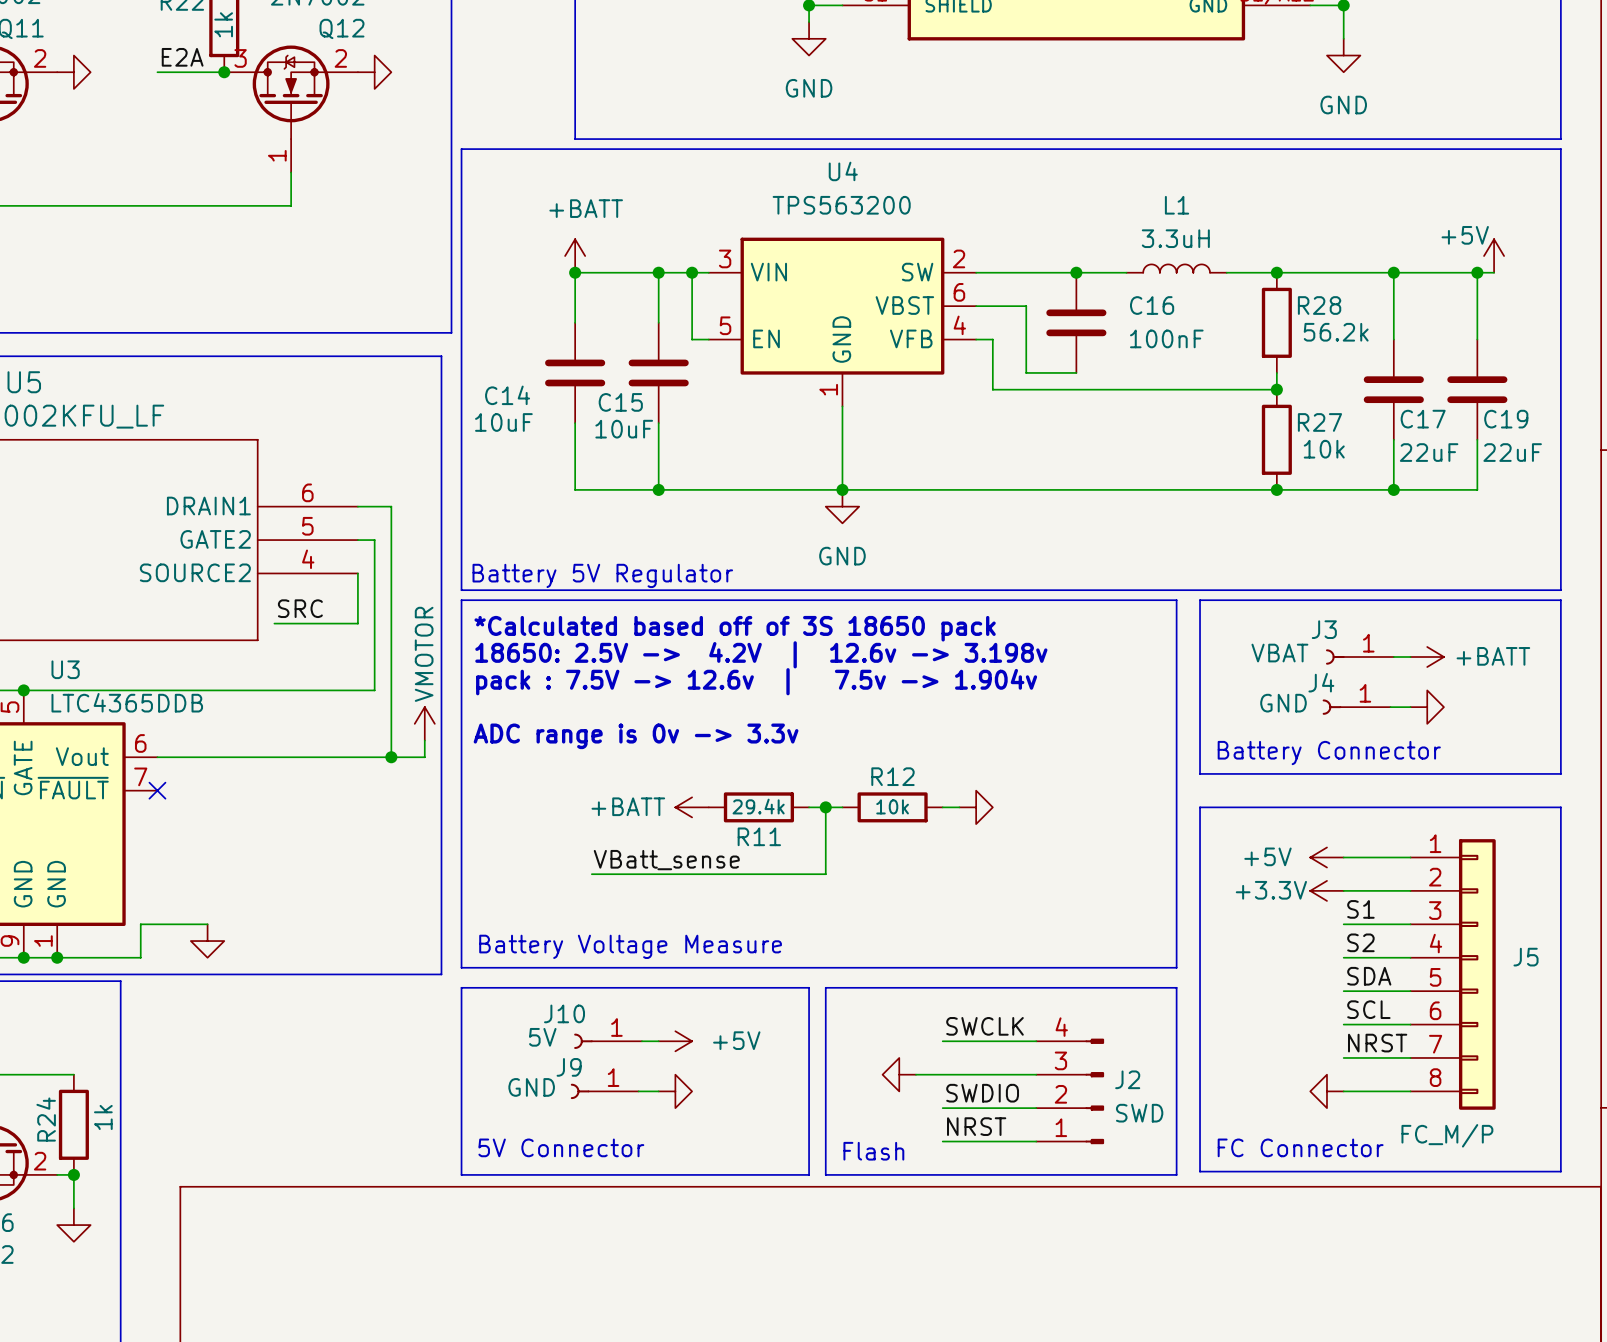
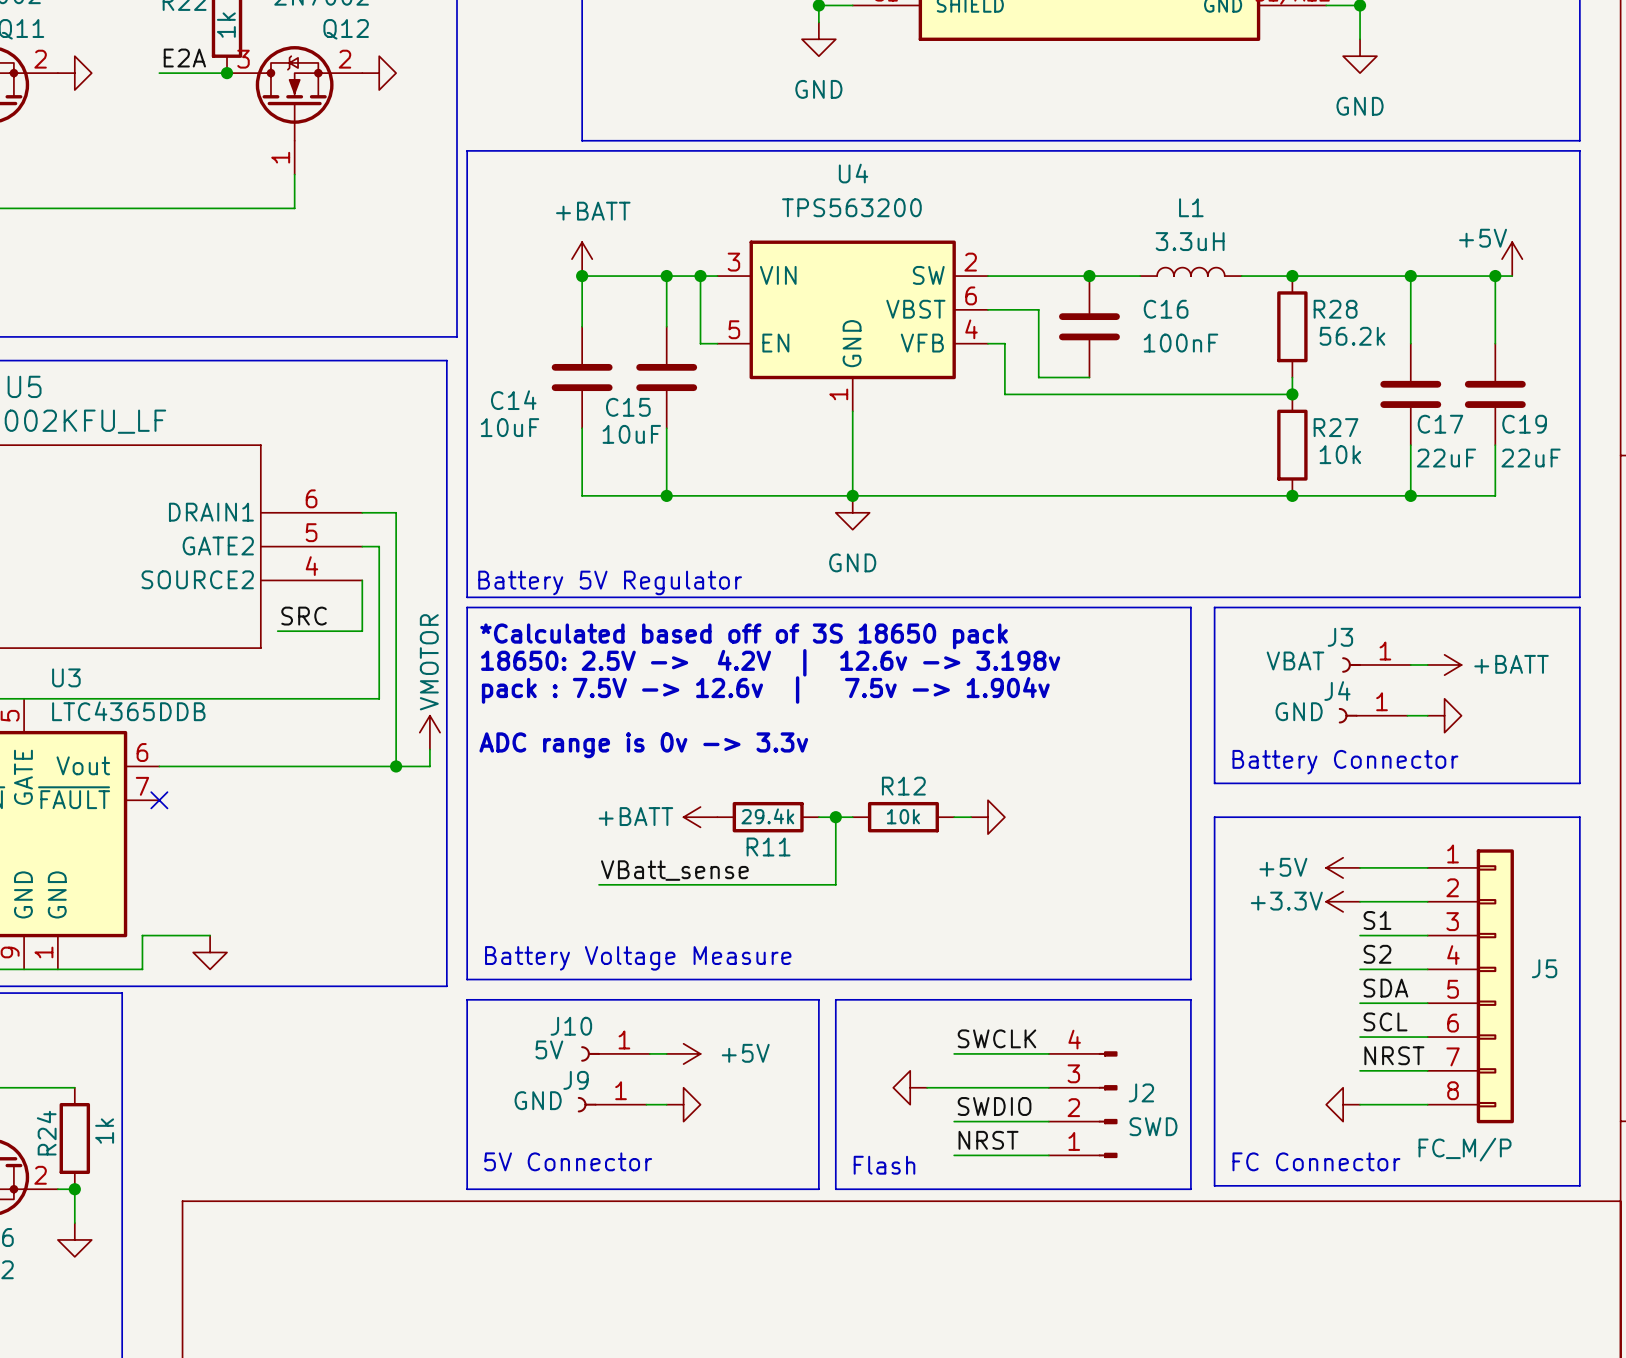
junction: (23, 690) -> none
junction: (23, 957) -> none
junction: (57, 957) -> none

